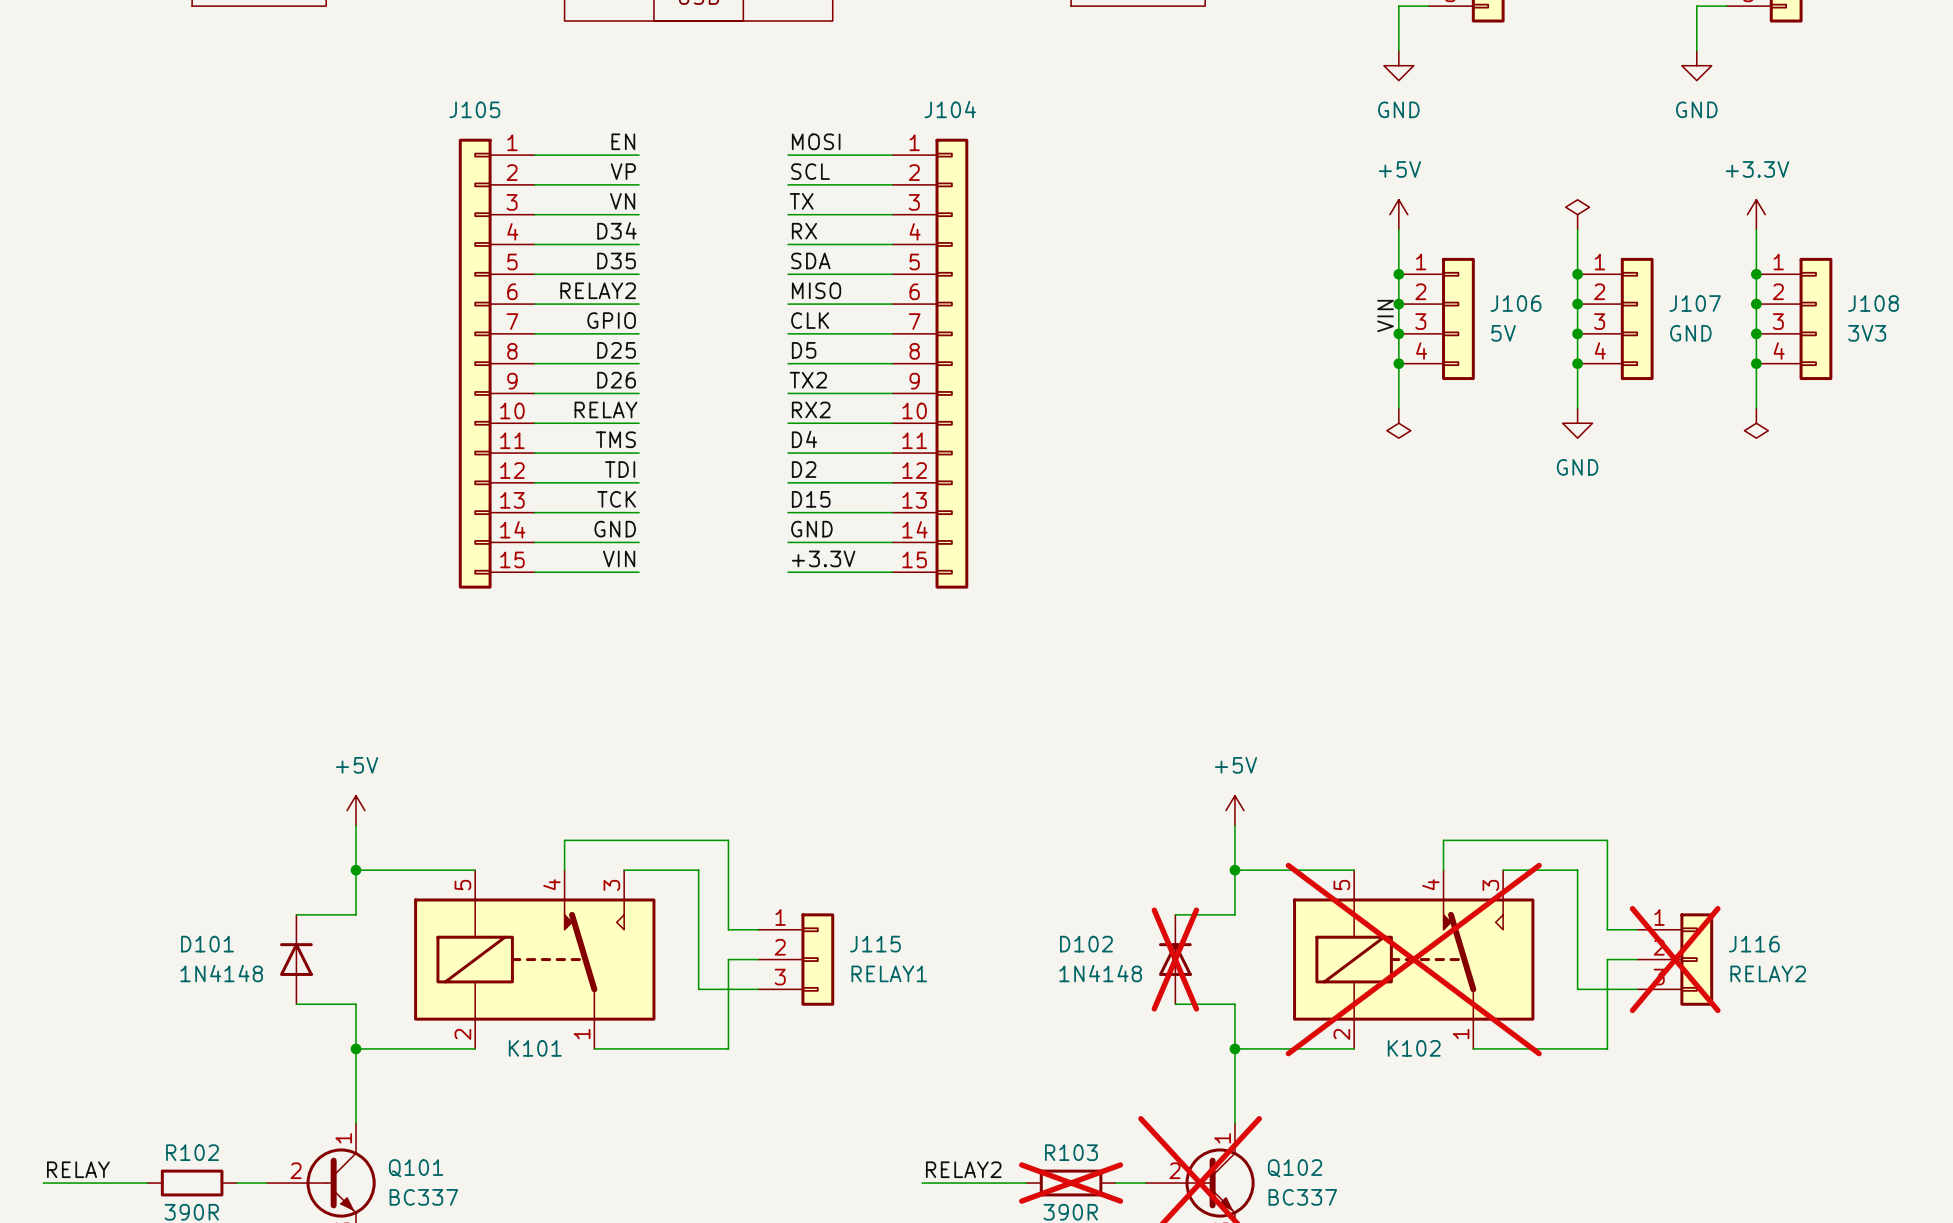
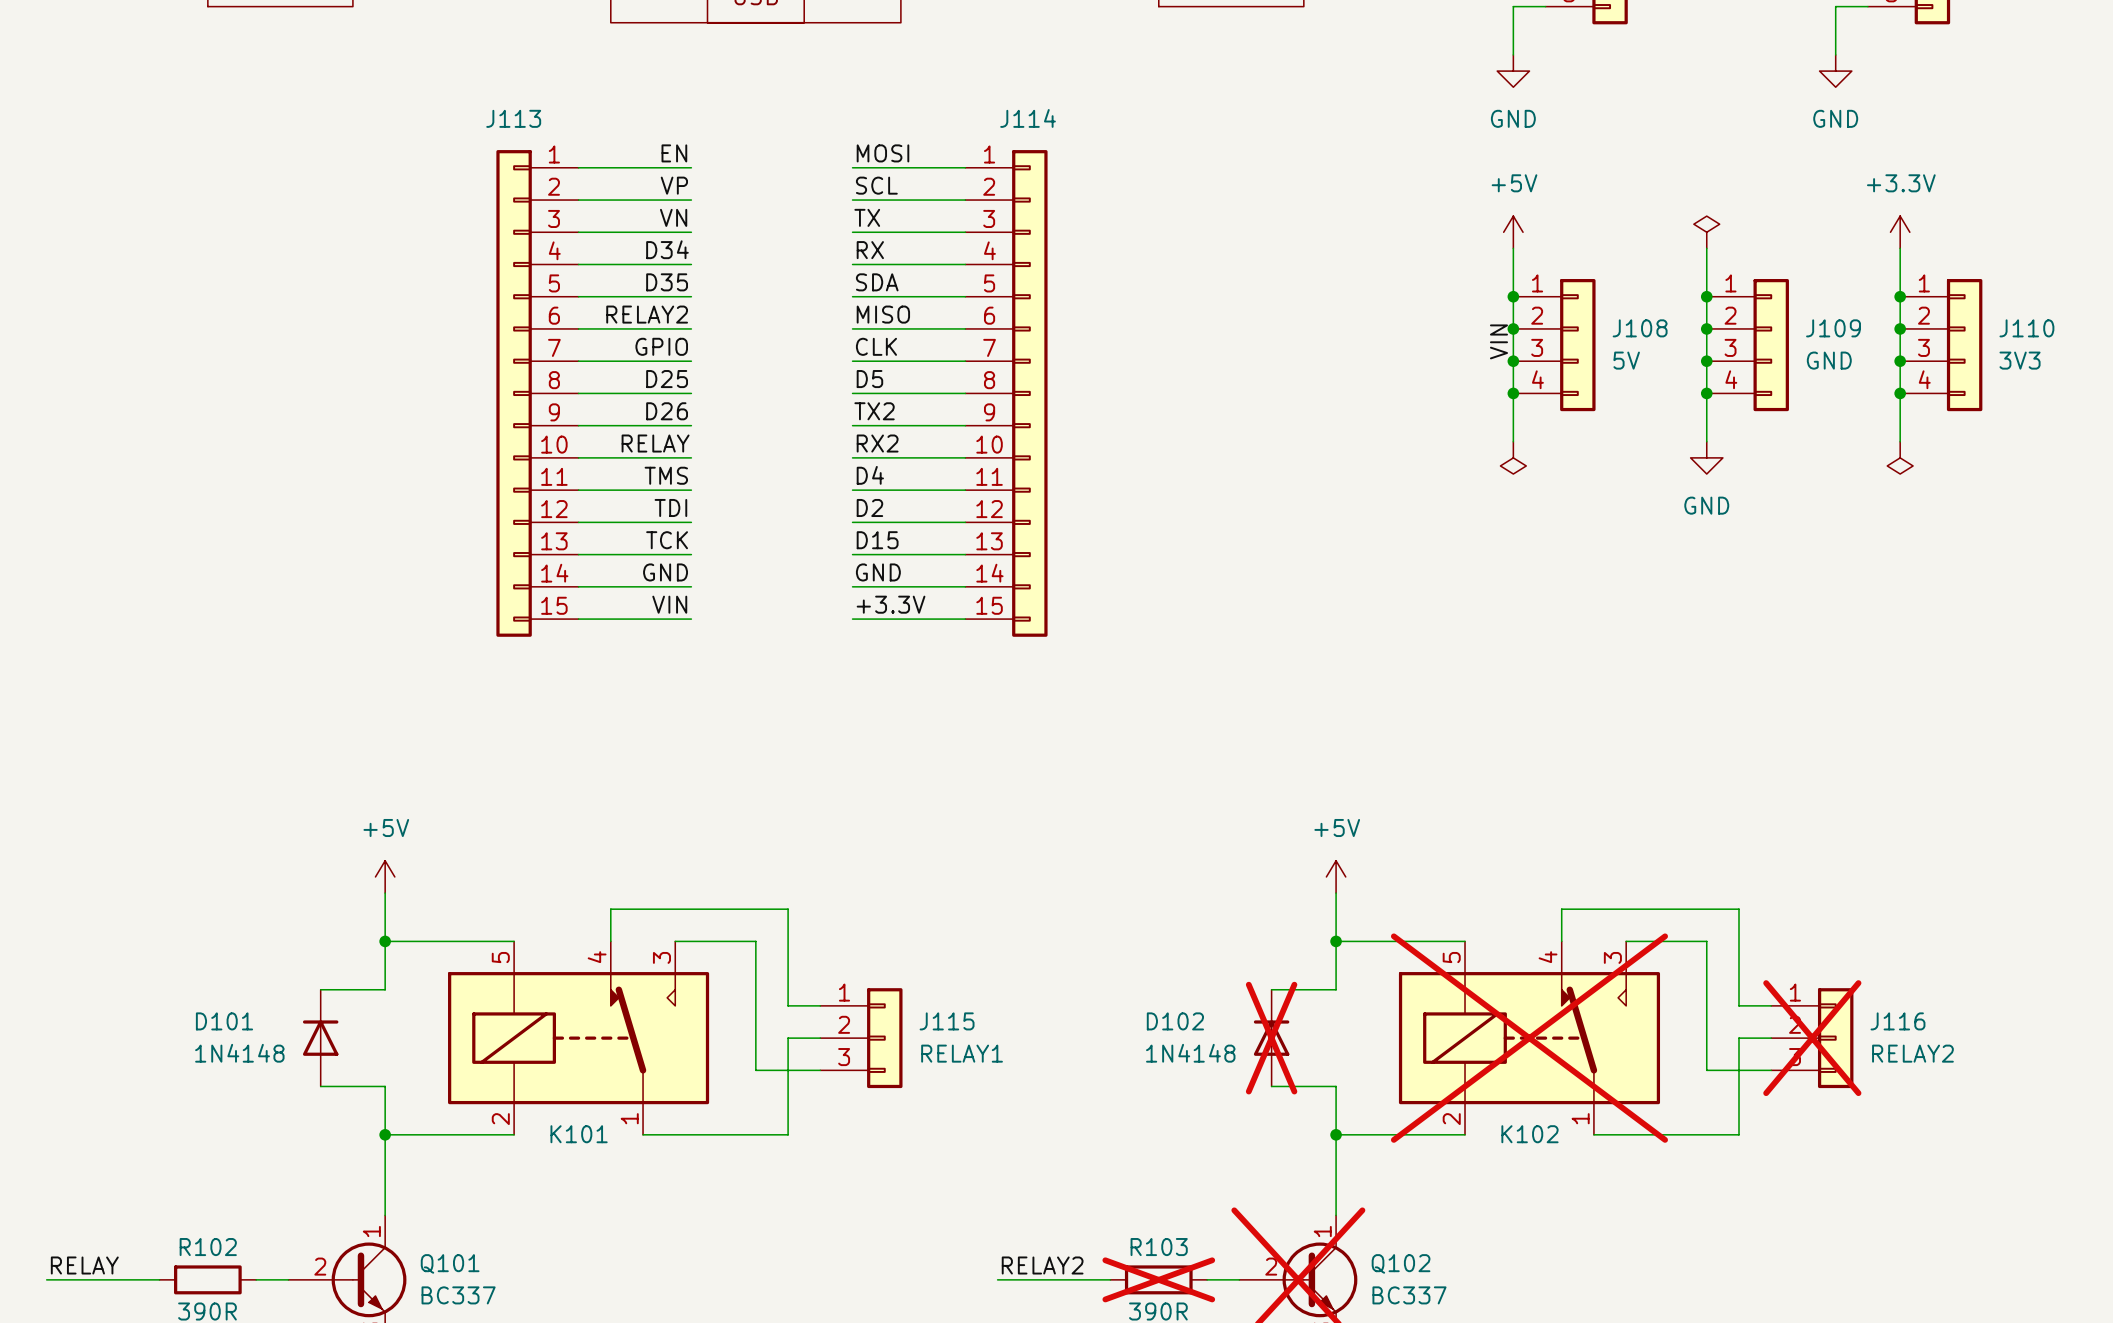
J105 name: J105 (474, 109) -> J113 (513, 118)
J104 name: J104 (950, 109) -> J114 (1028, 118)
J106 name: J106 (1516, 303) -> J108 (1640, 328)
J107 name: J107 (1695, 303) -> J109 (1833, 328)
J108 name: J108 (1873, 303) -> J110 (2026, 328)

